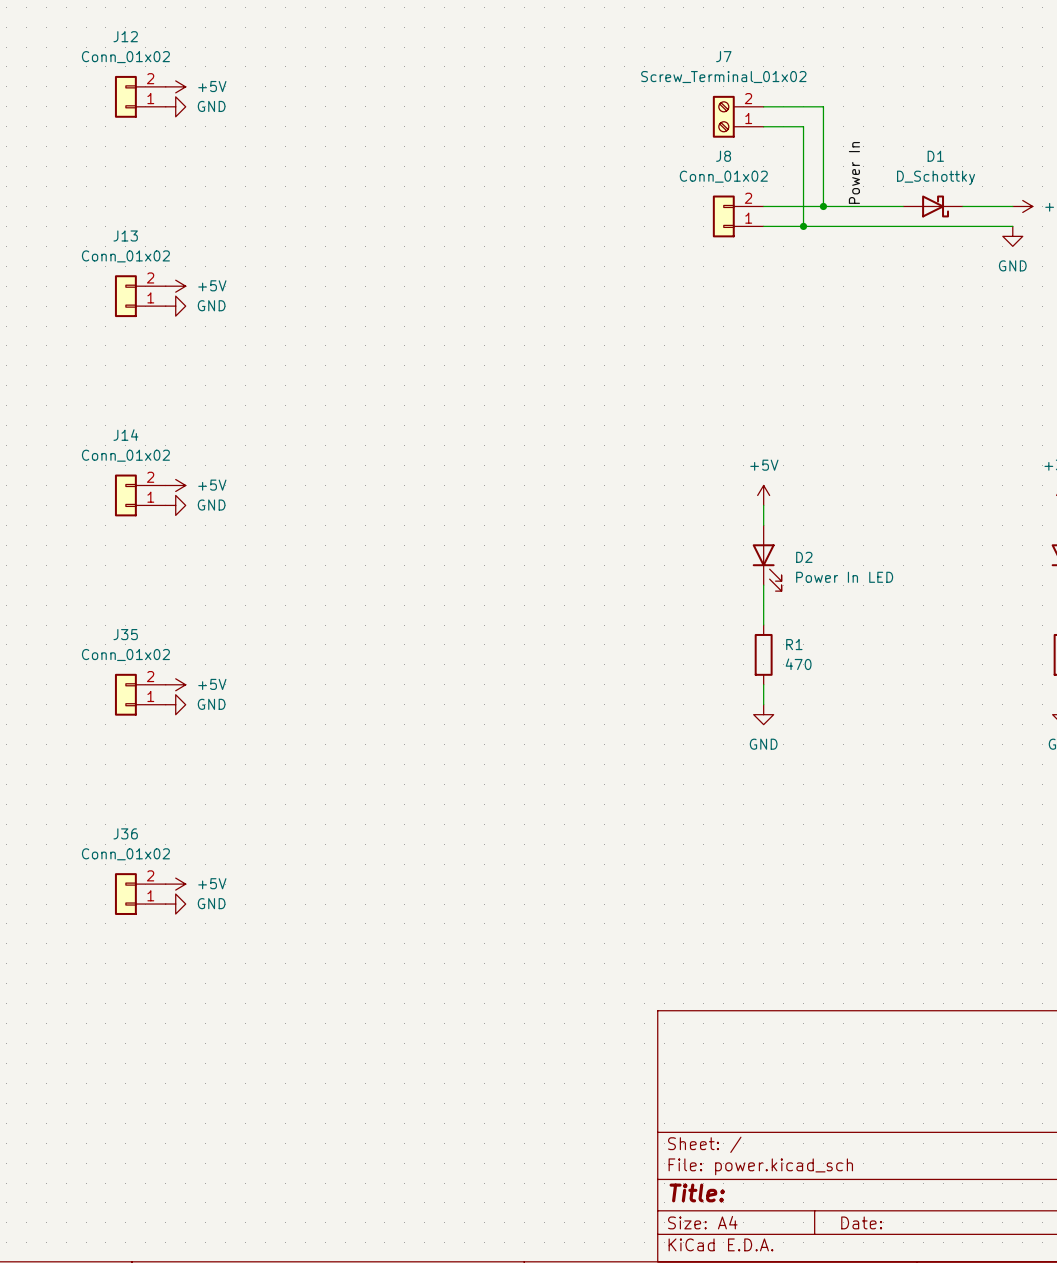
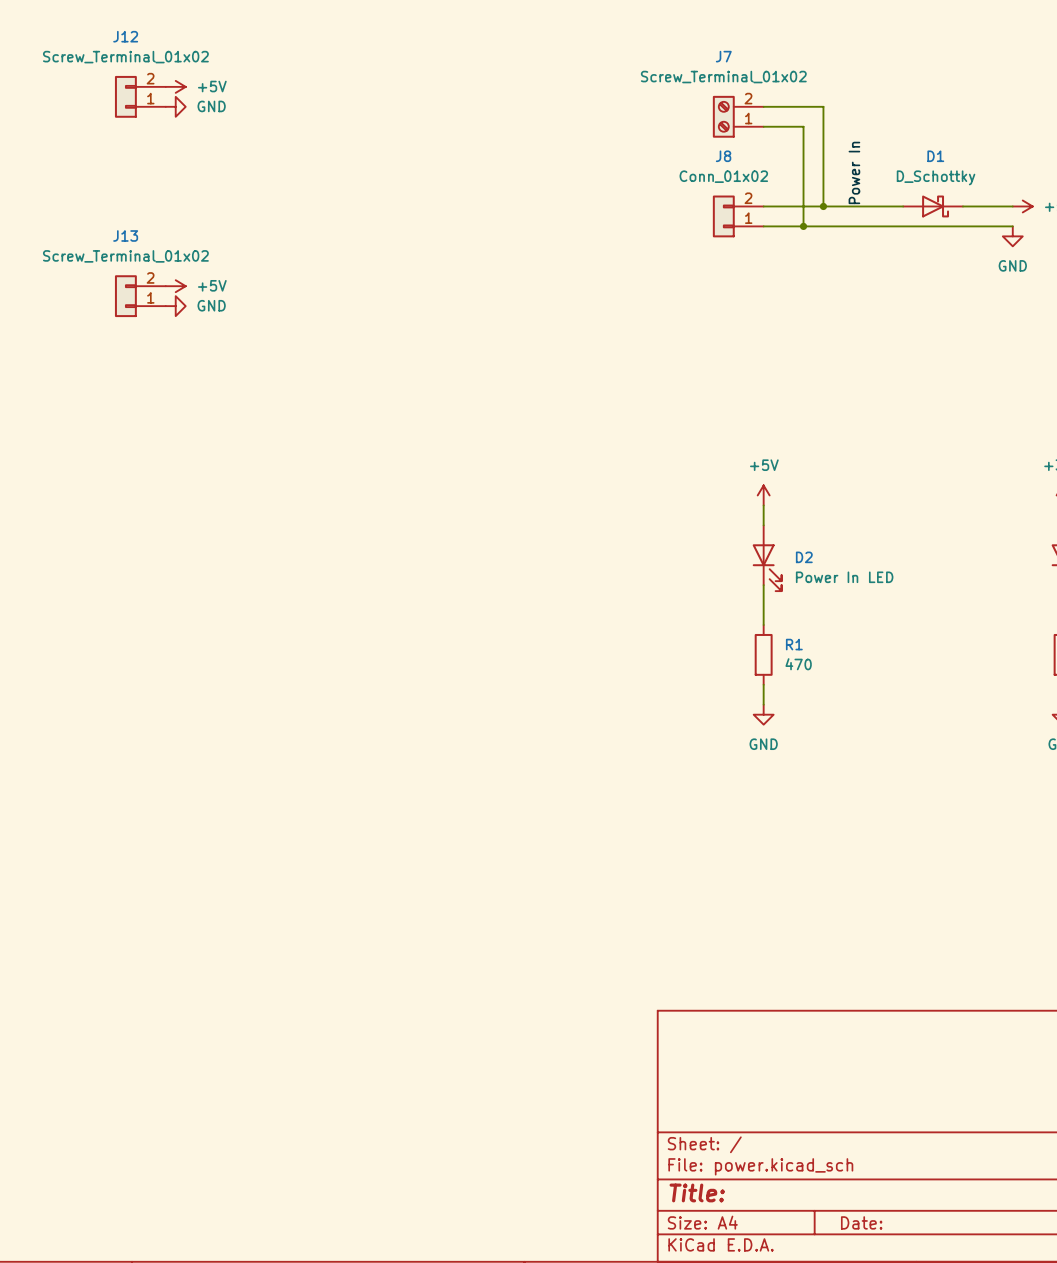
J12 value: Conn_01x02 (125, 57) -> Screw_Terminal_01x02 (125, 57)
J13 value: Conn_01x02 (125, 256) -> Screw_Terminal_01x02 (125, 256)
power symbol: +5V (175, 485) -> none
J14: Conn_01x02 (140, 495) -> none
power symbol: GND (175, 505) -> none
power symbol: +5V (175, 684) -> none
J35: Conn_01x02 (140, 694) -> none
power symbol: GND (175, 704) -> none
power symbol: +5V (175, 884) -> none
J36: Conn_01x02 (140, 894) -> none
power symbol: GND (175, 904) -> none

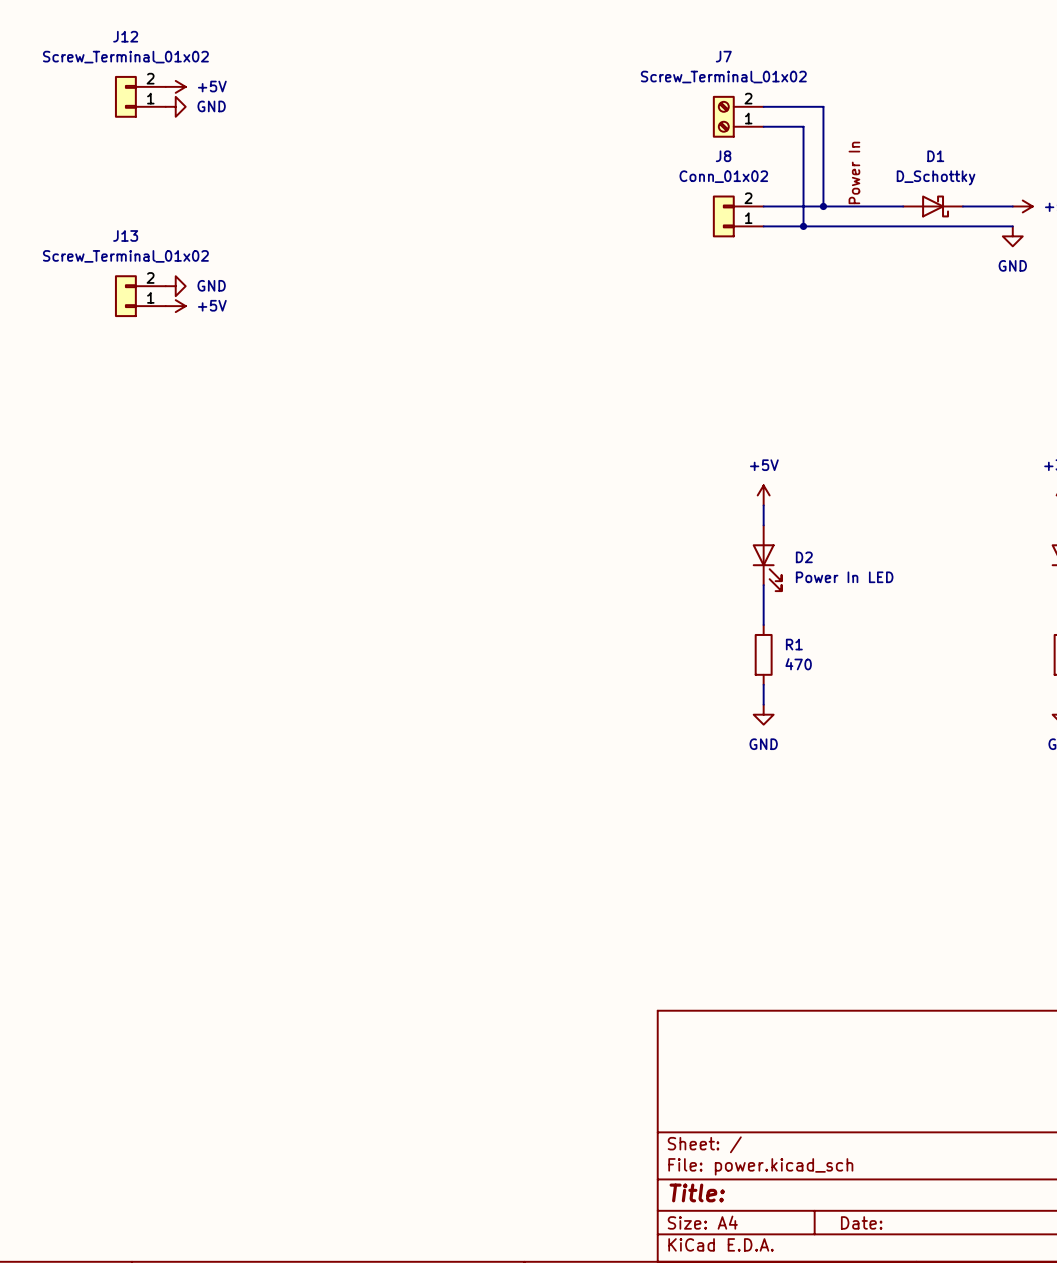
power symbol: +5V (175, 286) -> GND (175, 286)
power symbol: GND (175, 306) -> +5V (175, 306)

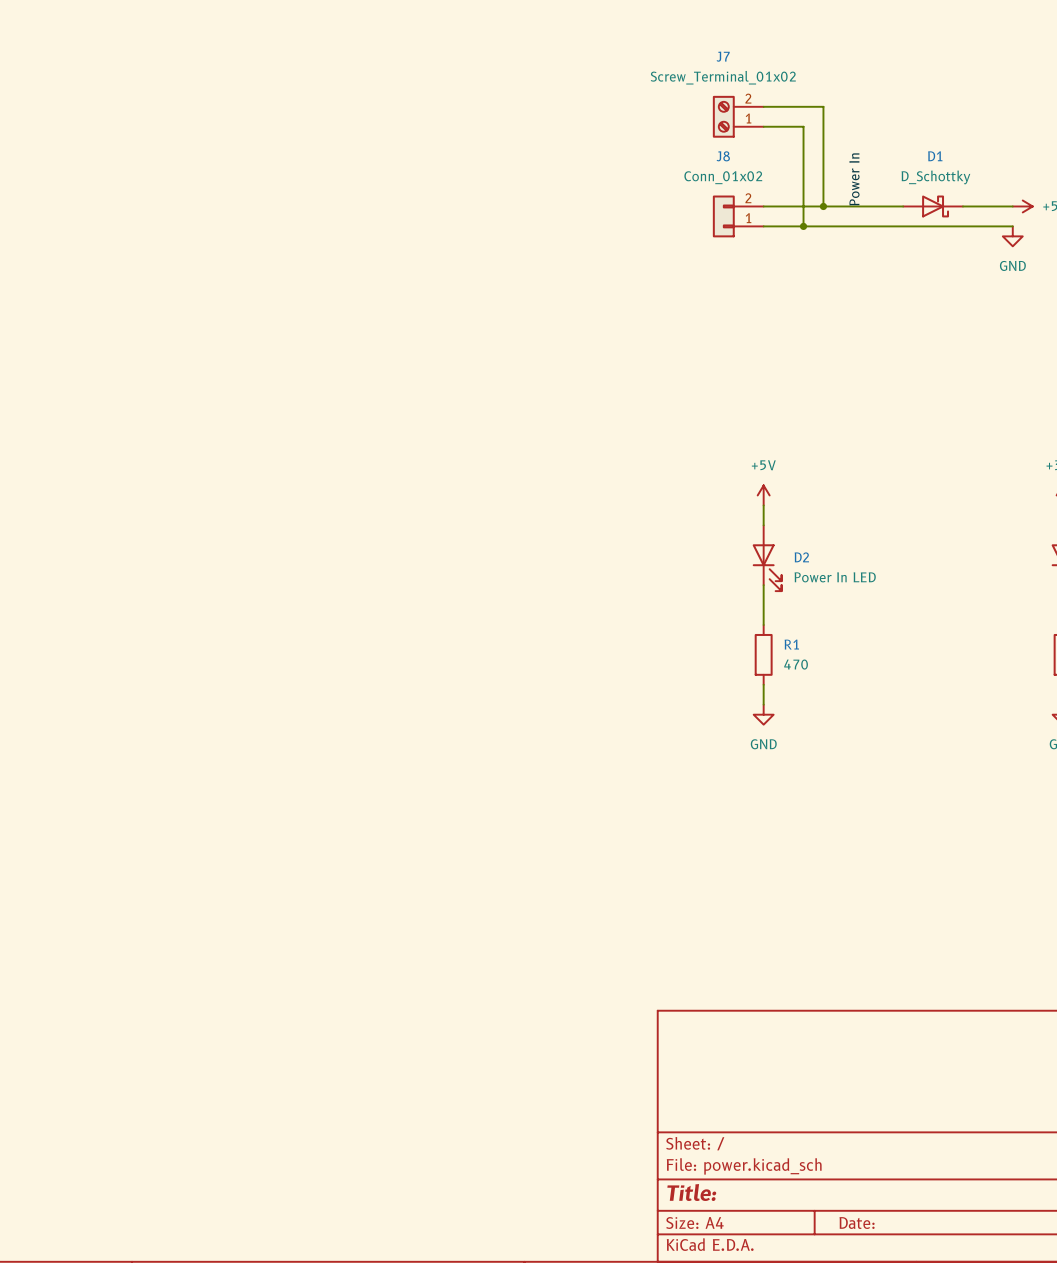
power symbol: +5V (175, 86) -> none
J12: Screw_Terminal_01x02 (140, 96) -> none
power symbol: GND (175, 106) -> none
power symbol: GND (175, 286) -> none
J13: Screw_Terminal_01x02 (140, 296) -> none
power symbol: +5V (175, 306) -> none

